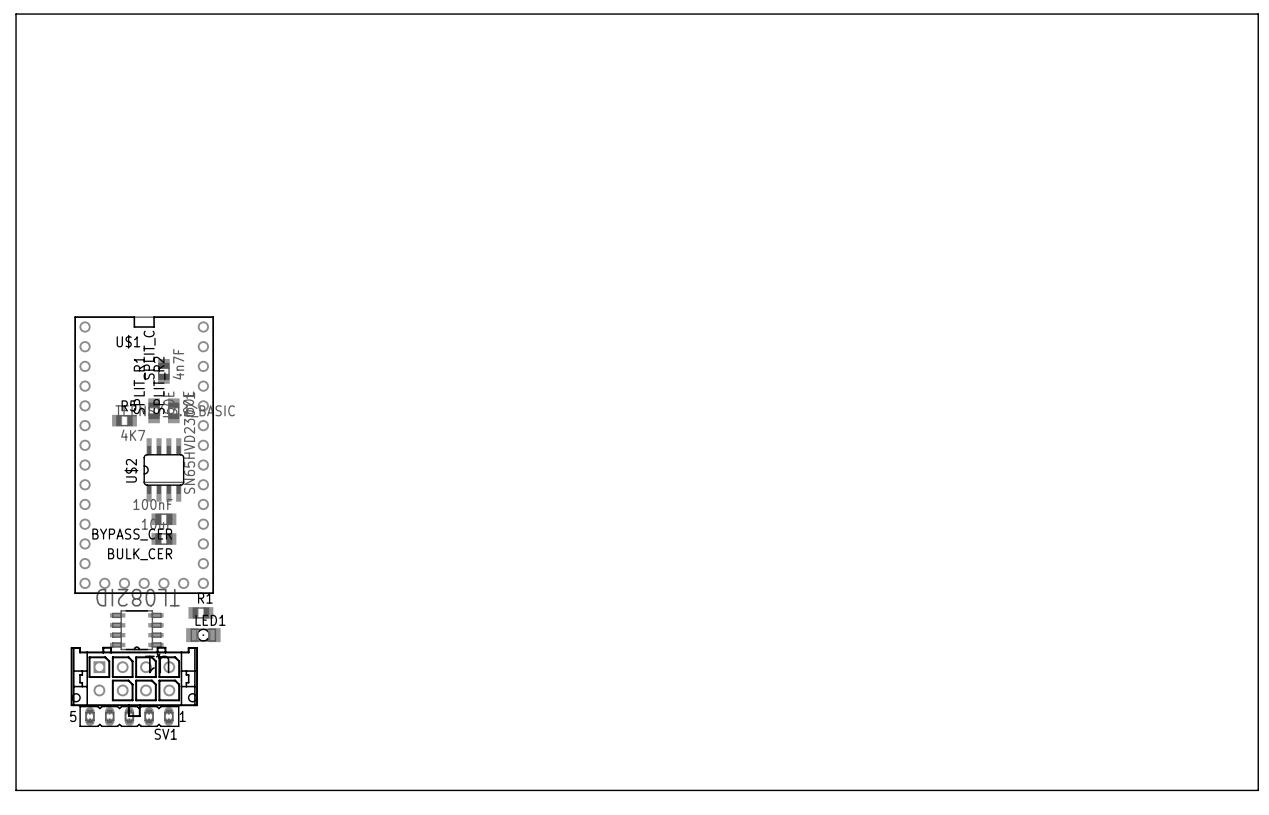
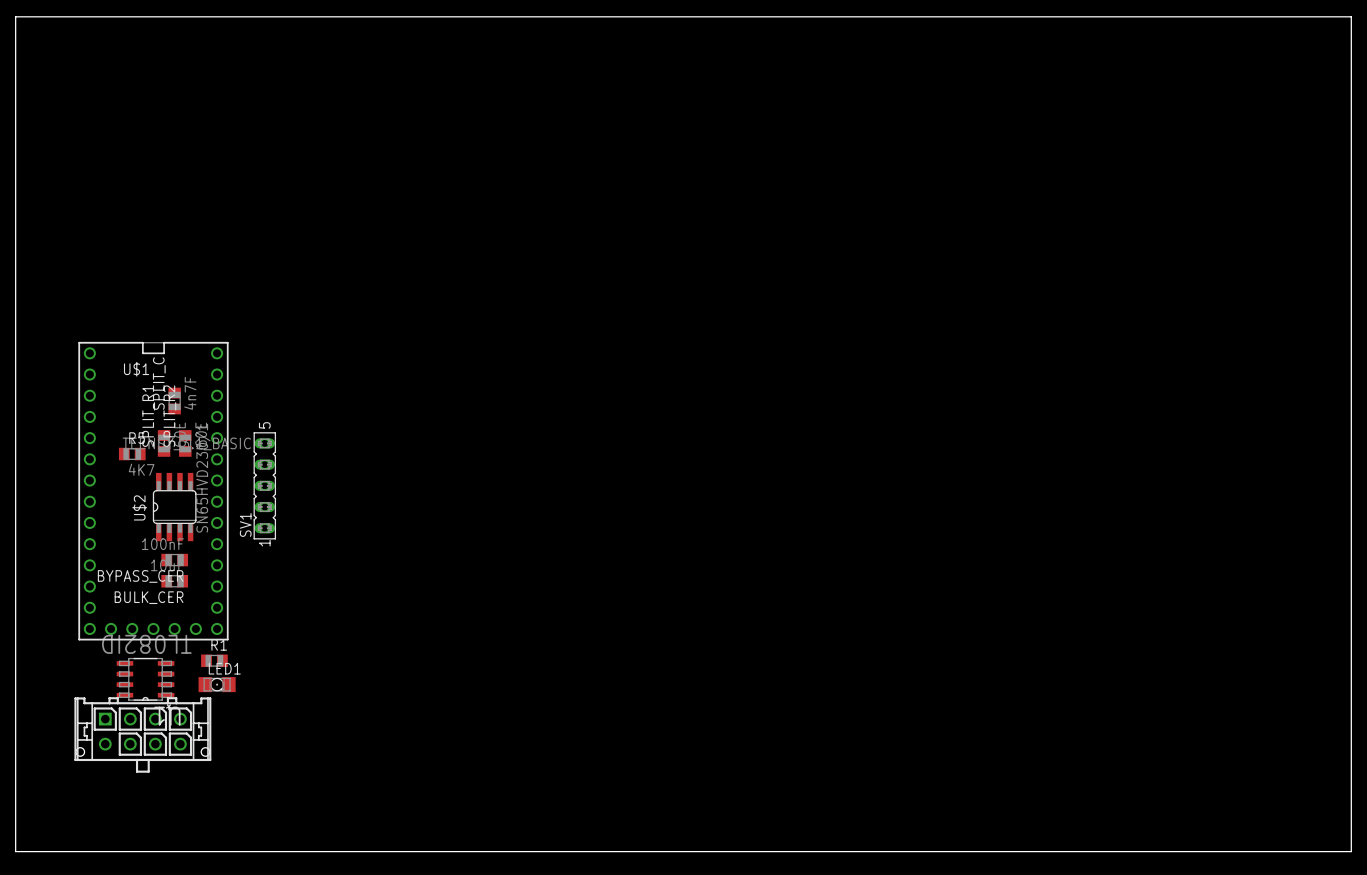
SV1 footprint: [79, 706, 180, 727] -> [253, 432, 277, 540]
SV1 name position: SV1 (165, 734) -> SV1 (245, 524)

